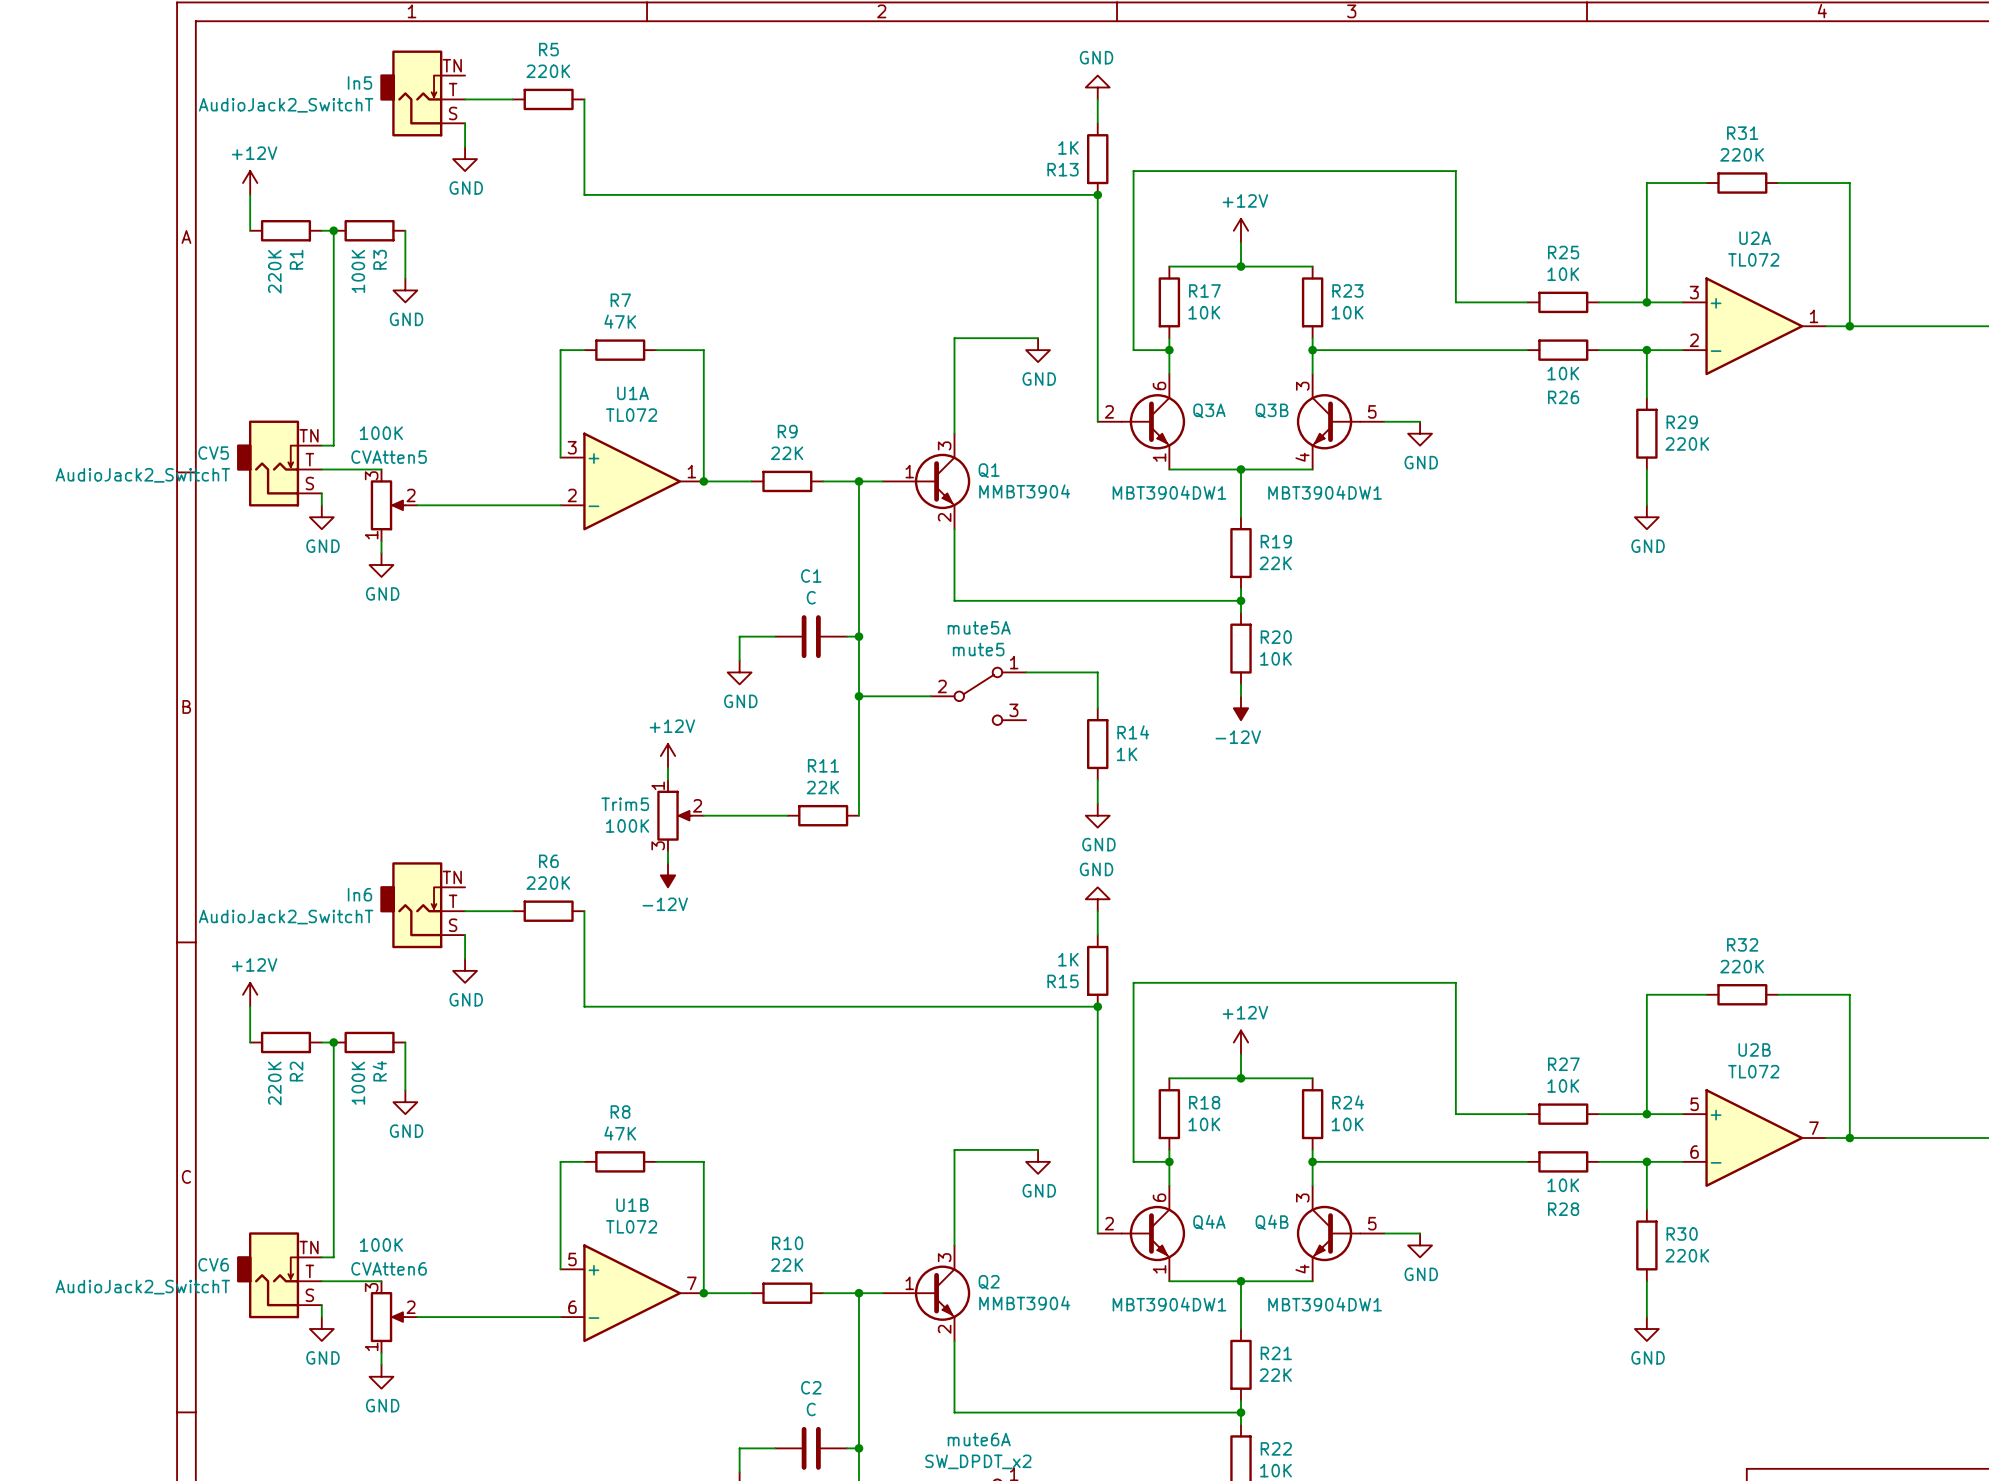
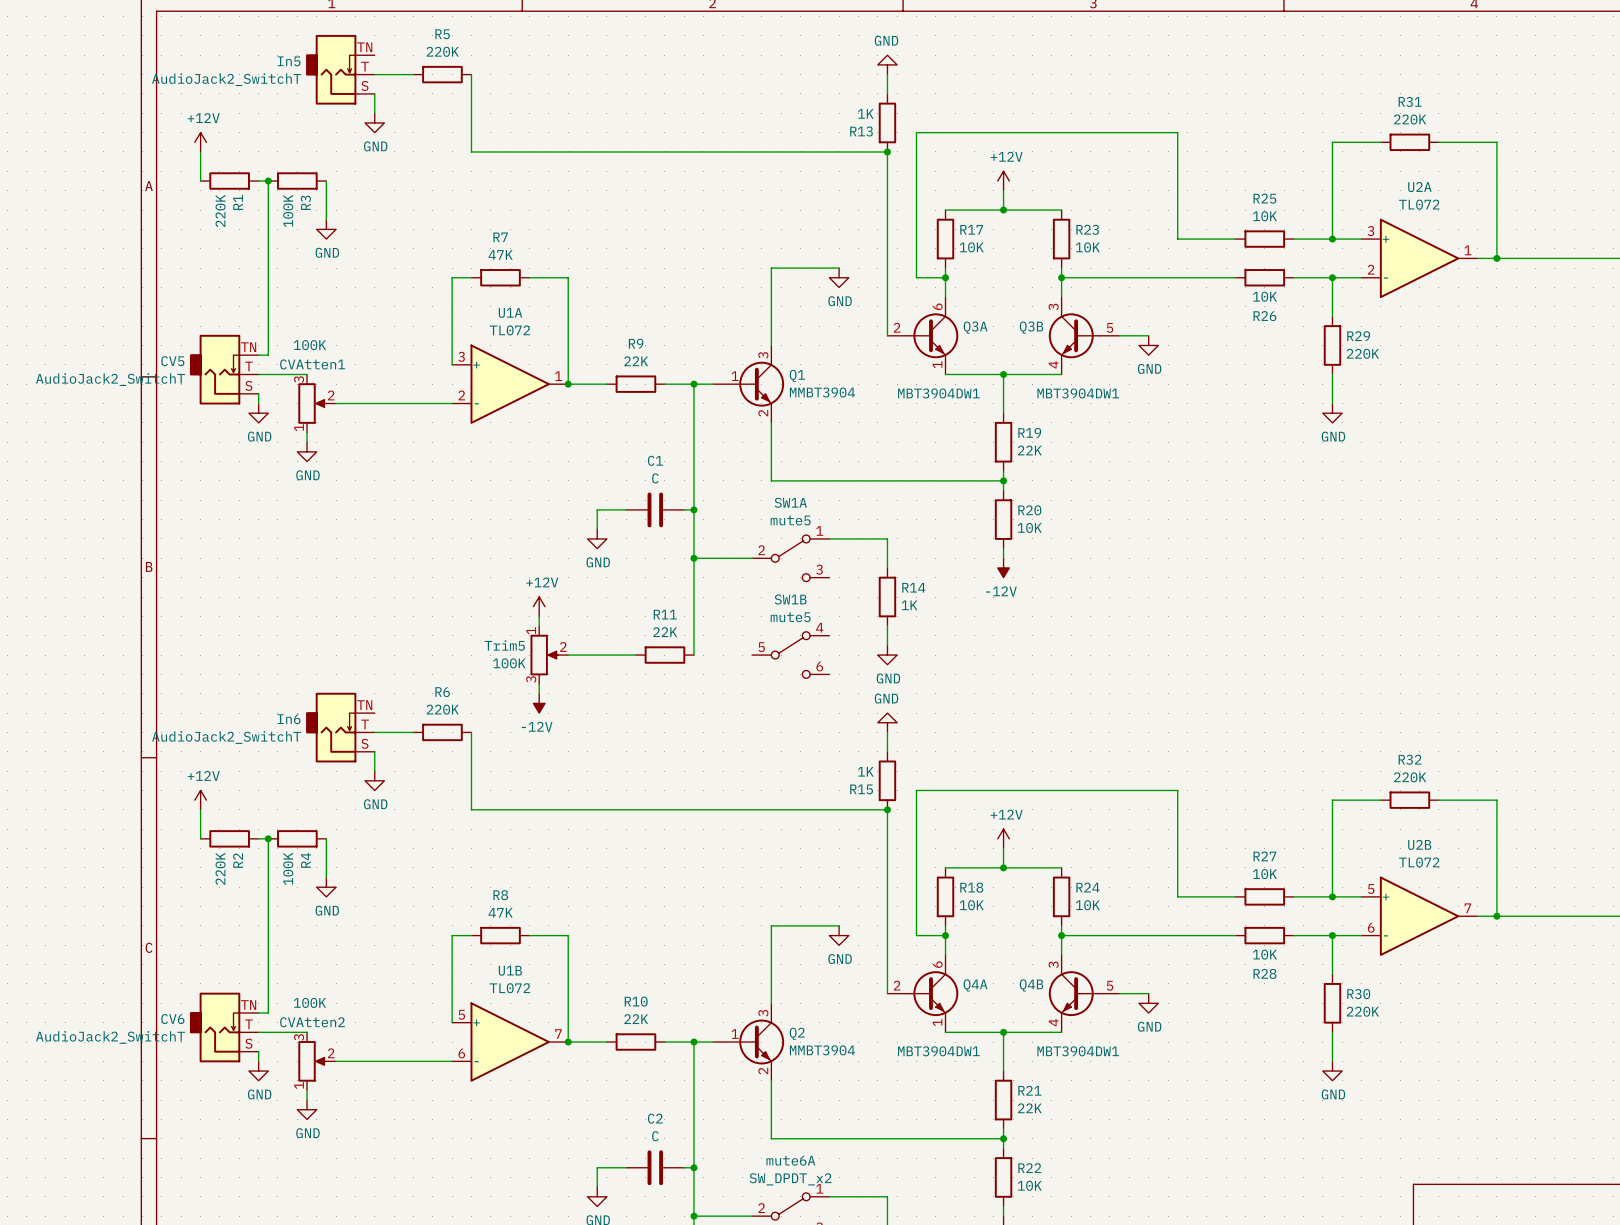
CVAtten5 name: CVAtten5 (389, 457) -> CVAtten1 (312, 364)
mute5A name: mute5A (979, 627) -> SW1A (790, 502)
SW1B: none -> mute5 (790, 655)
CVAtten6 name: CVAtten6 (389, 1268) -> CVAtten2 (312, 1022)

